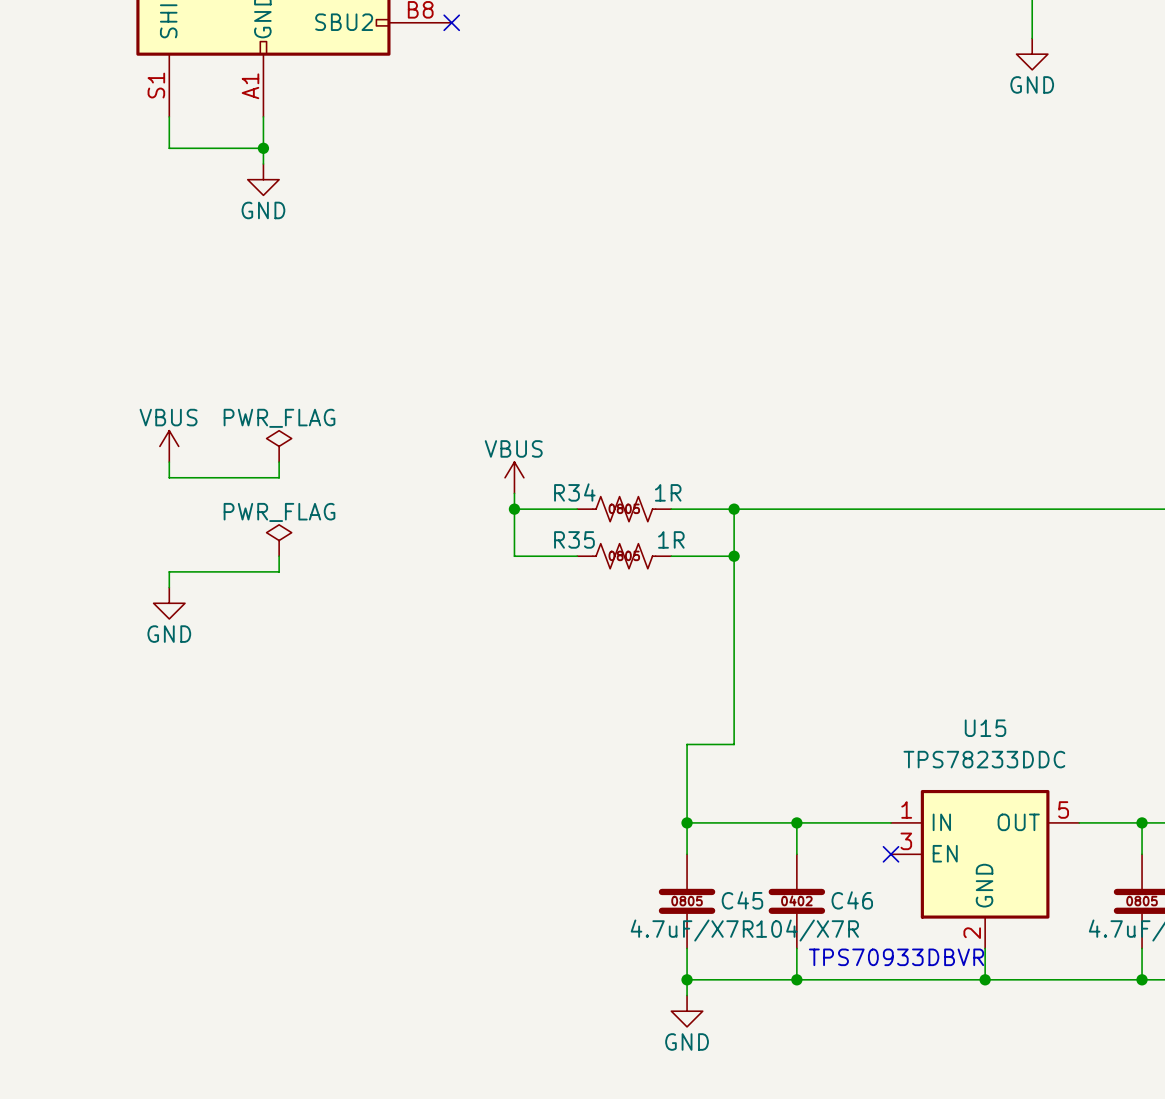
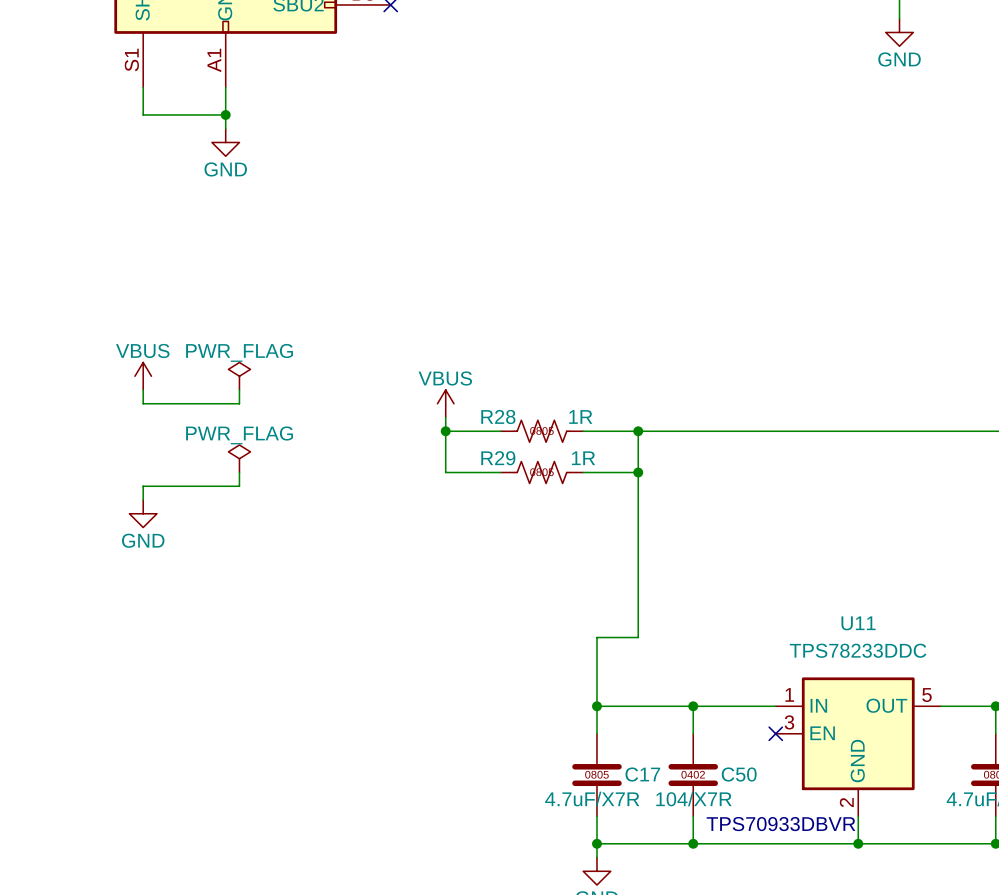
R34 name: R34 (574, 492) -> R28 (498, 416)
R35 name: R35 (574, 539) -> R29 (498, 458)
U15 name: U15 (985, 728) -> U11 (858, 623)
C45 name: C45 (742, 900) -> C17 (642, 774)
C46 name: C46 (852, 900) -> C50 (739, 774)

